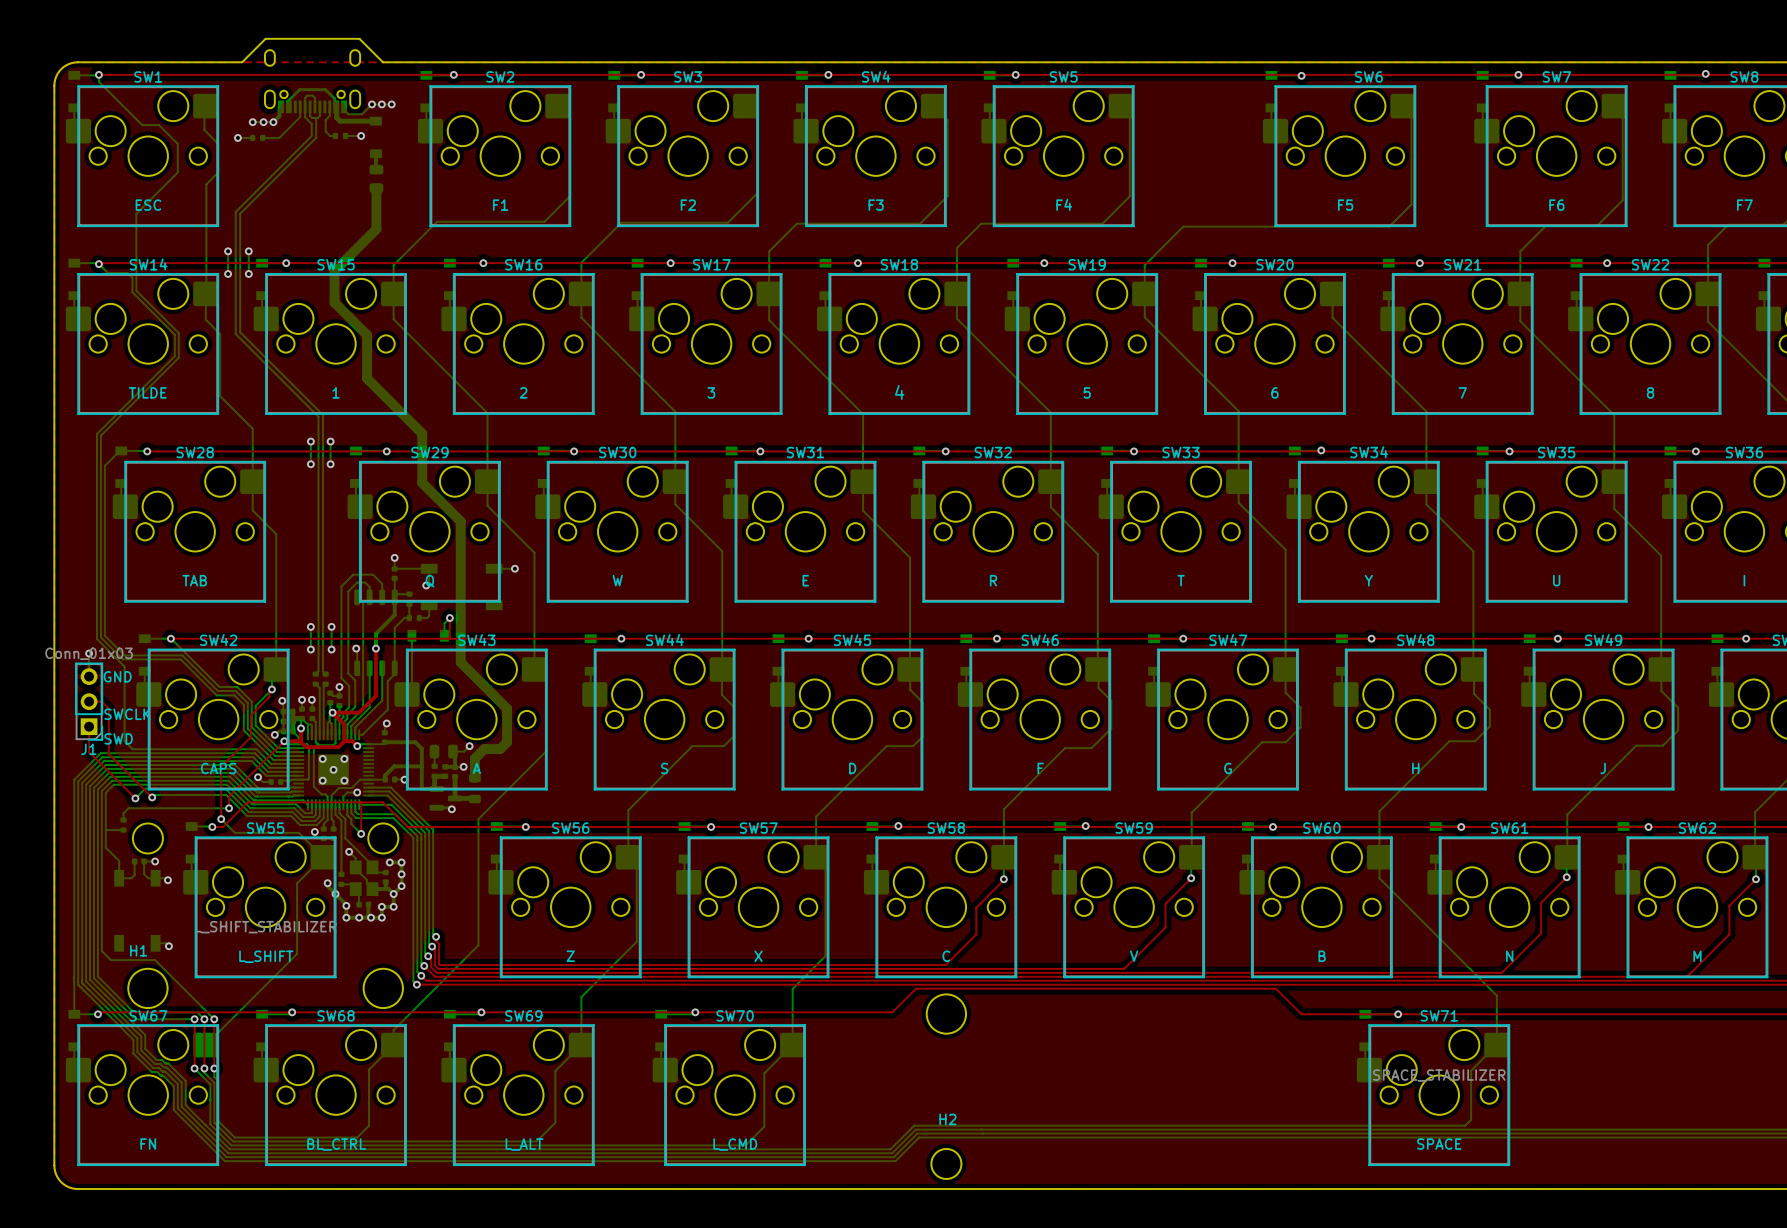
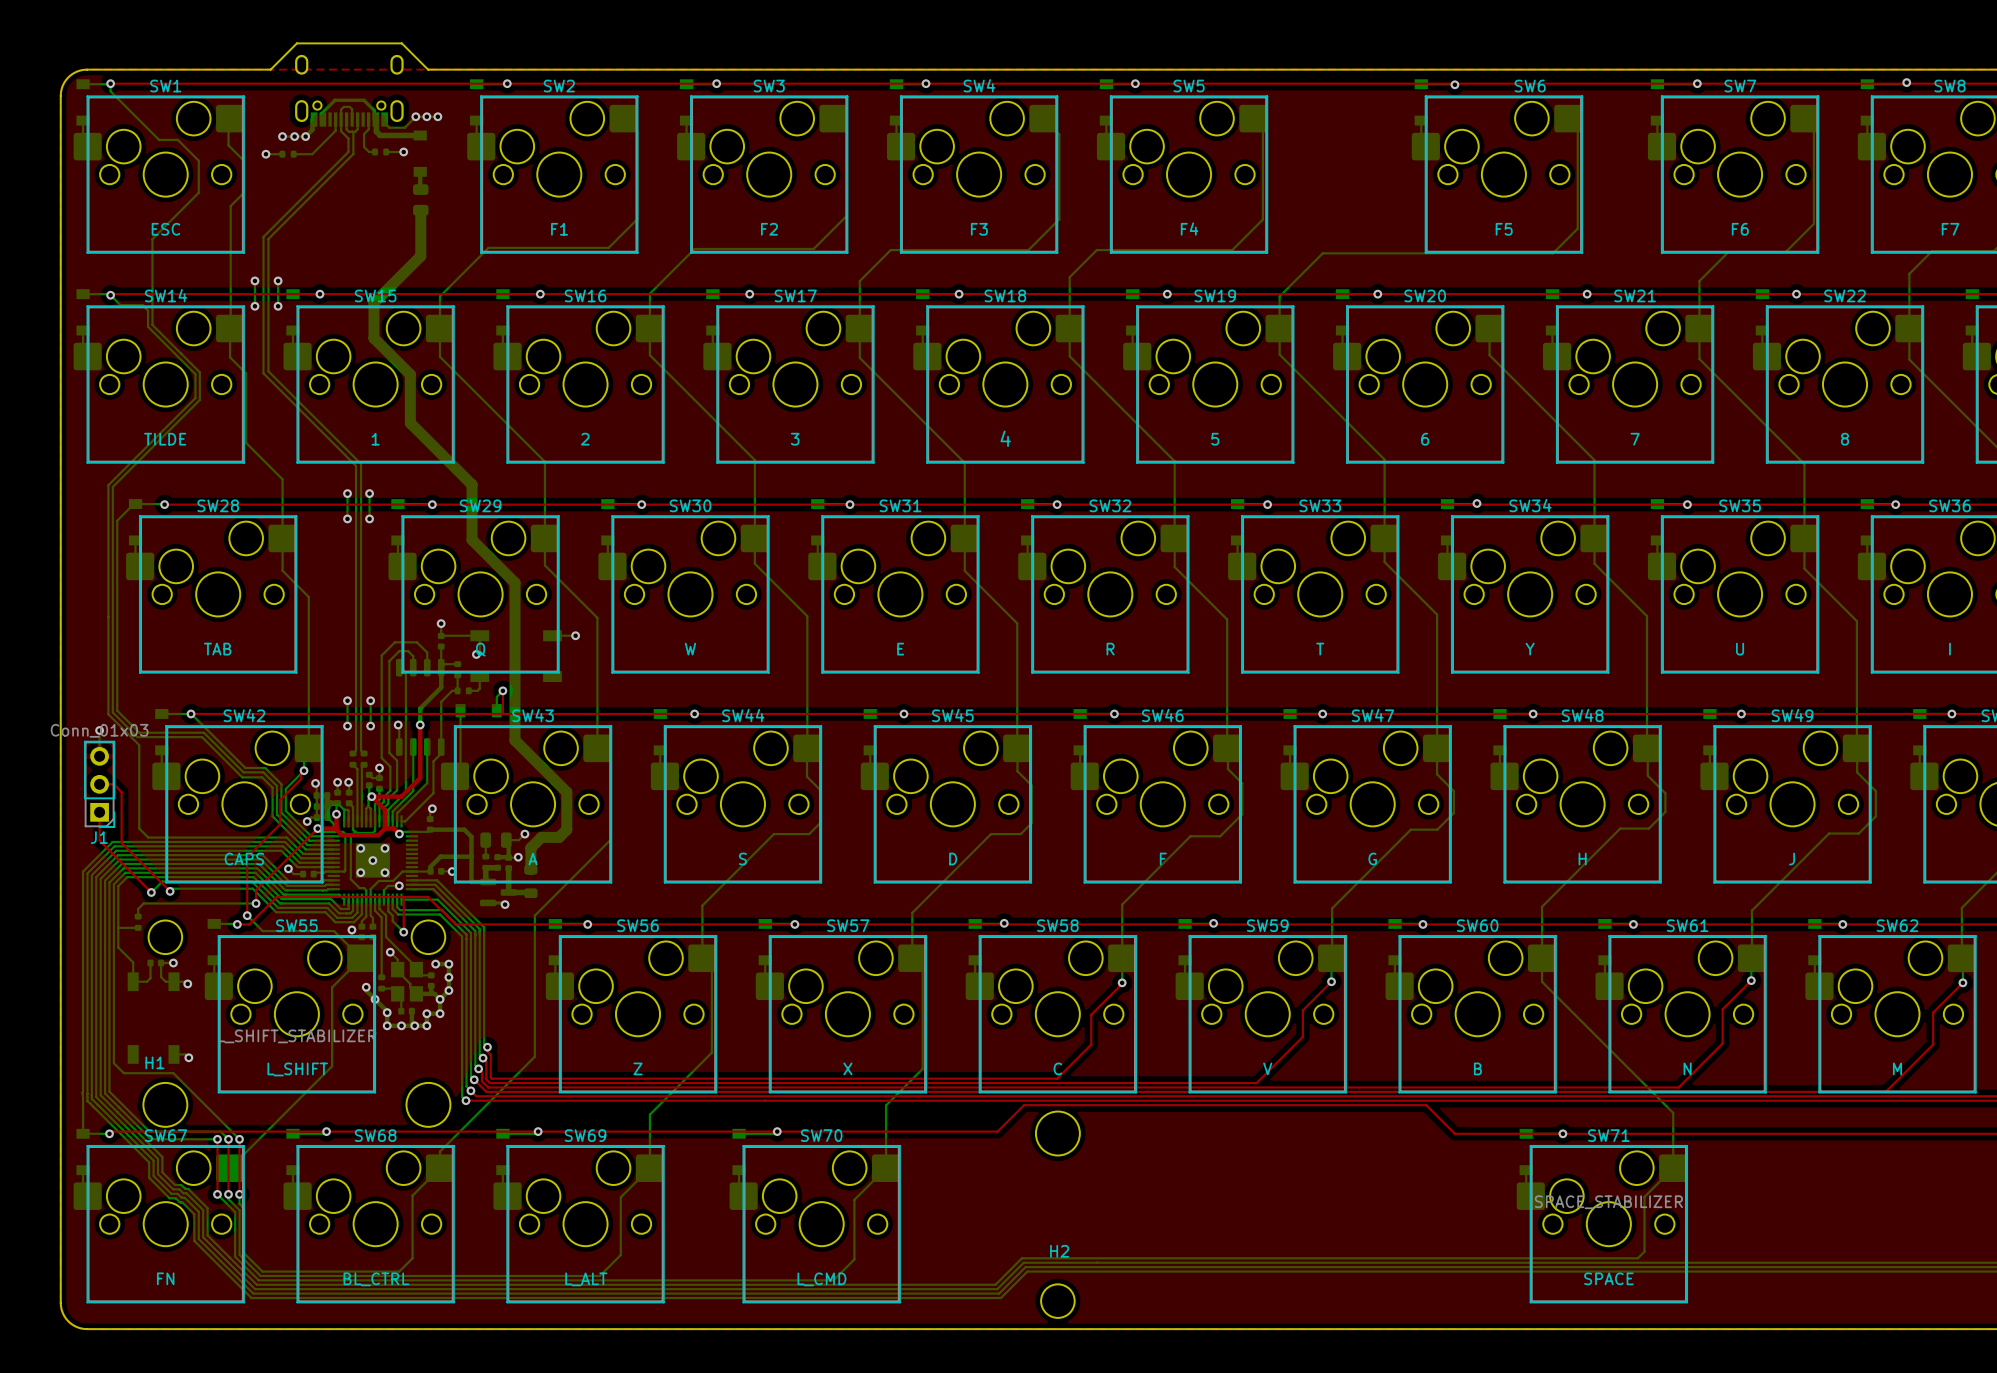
text: GND (117, 676) -> none
text: SWCLK (127, 714) -> none
text: SWD (118, 738) -> none

